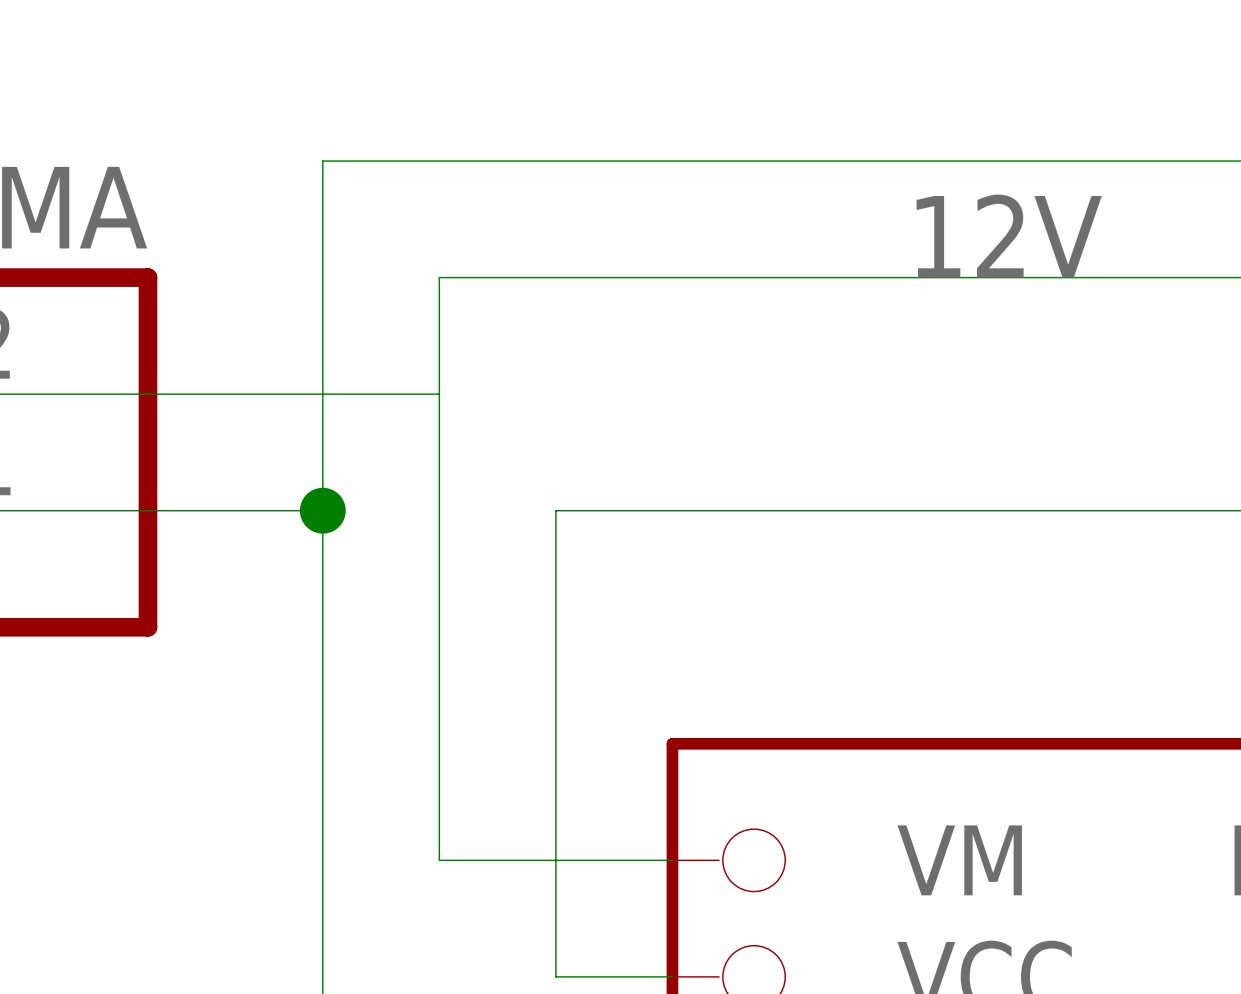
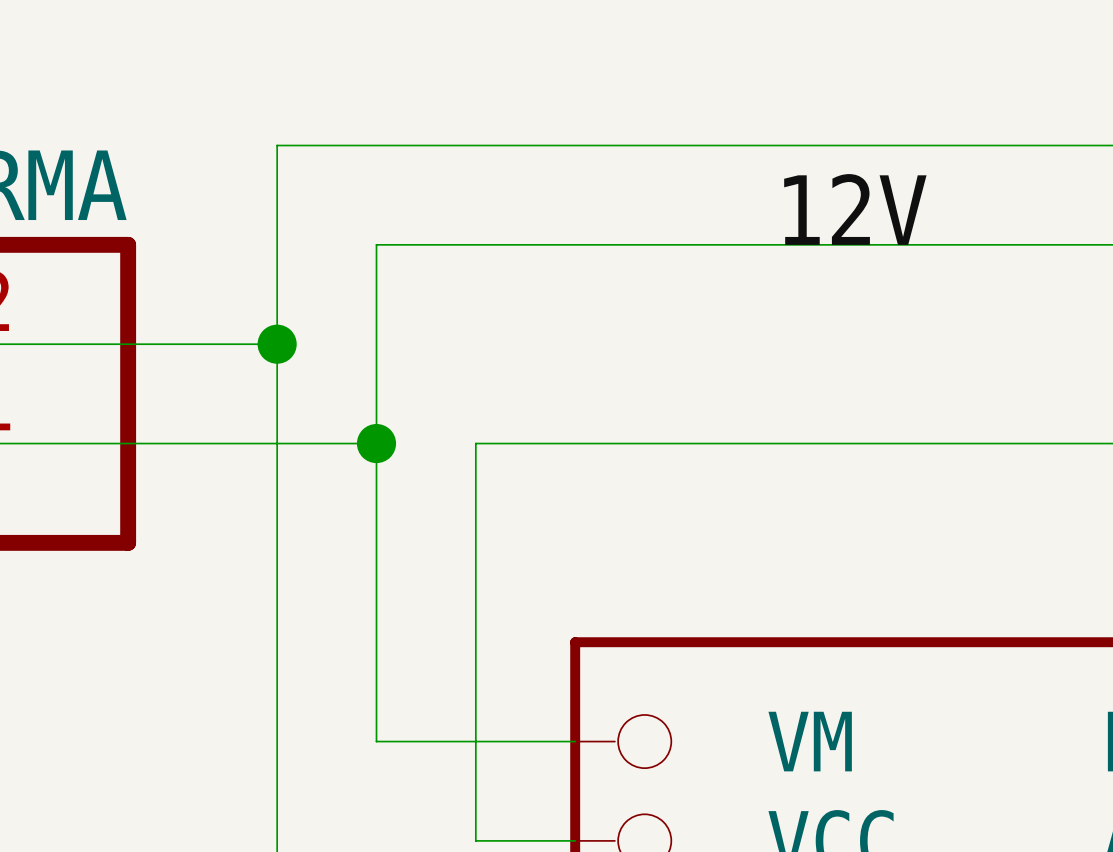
wire: (322, 394) (439, 394) -> (277, 443) (376, 443)
junction: none -> (277, 344)
junction: (322, 510) -> none
junction: none -> (376, 443)

